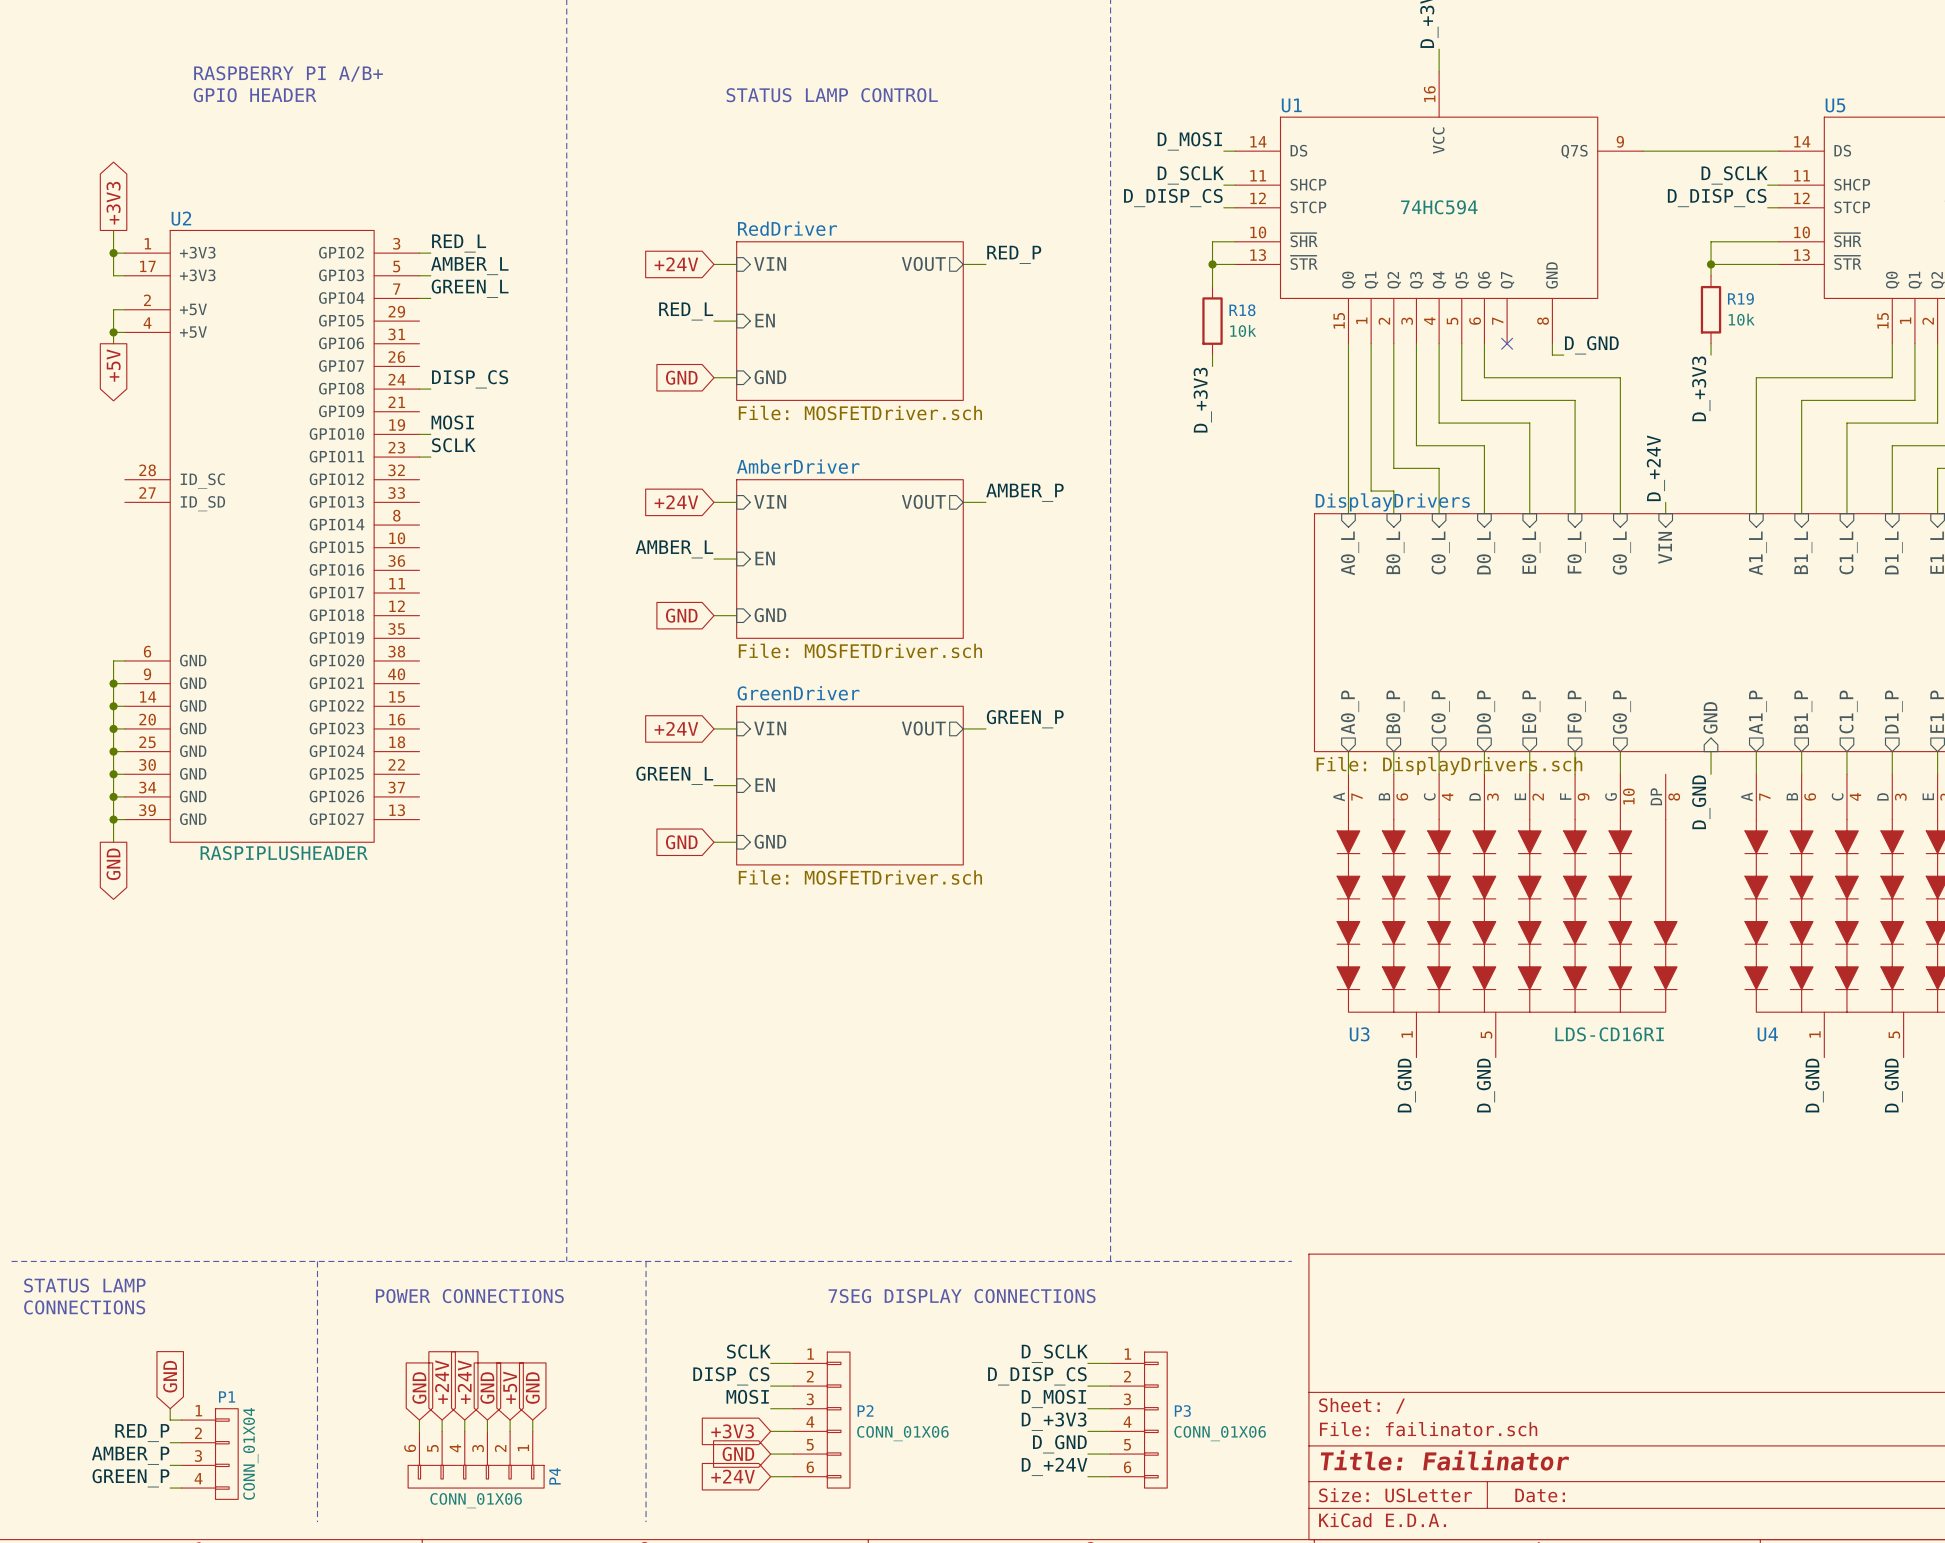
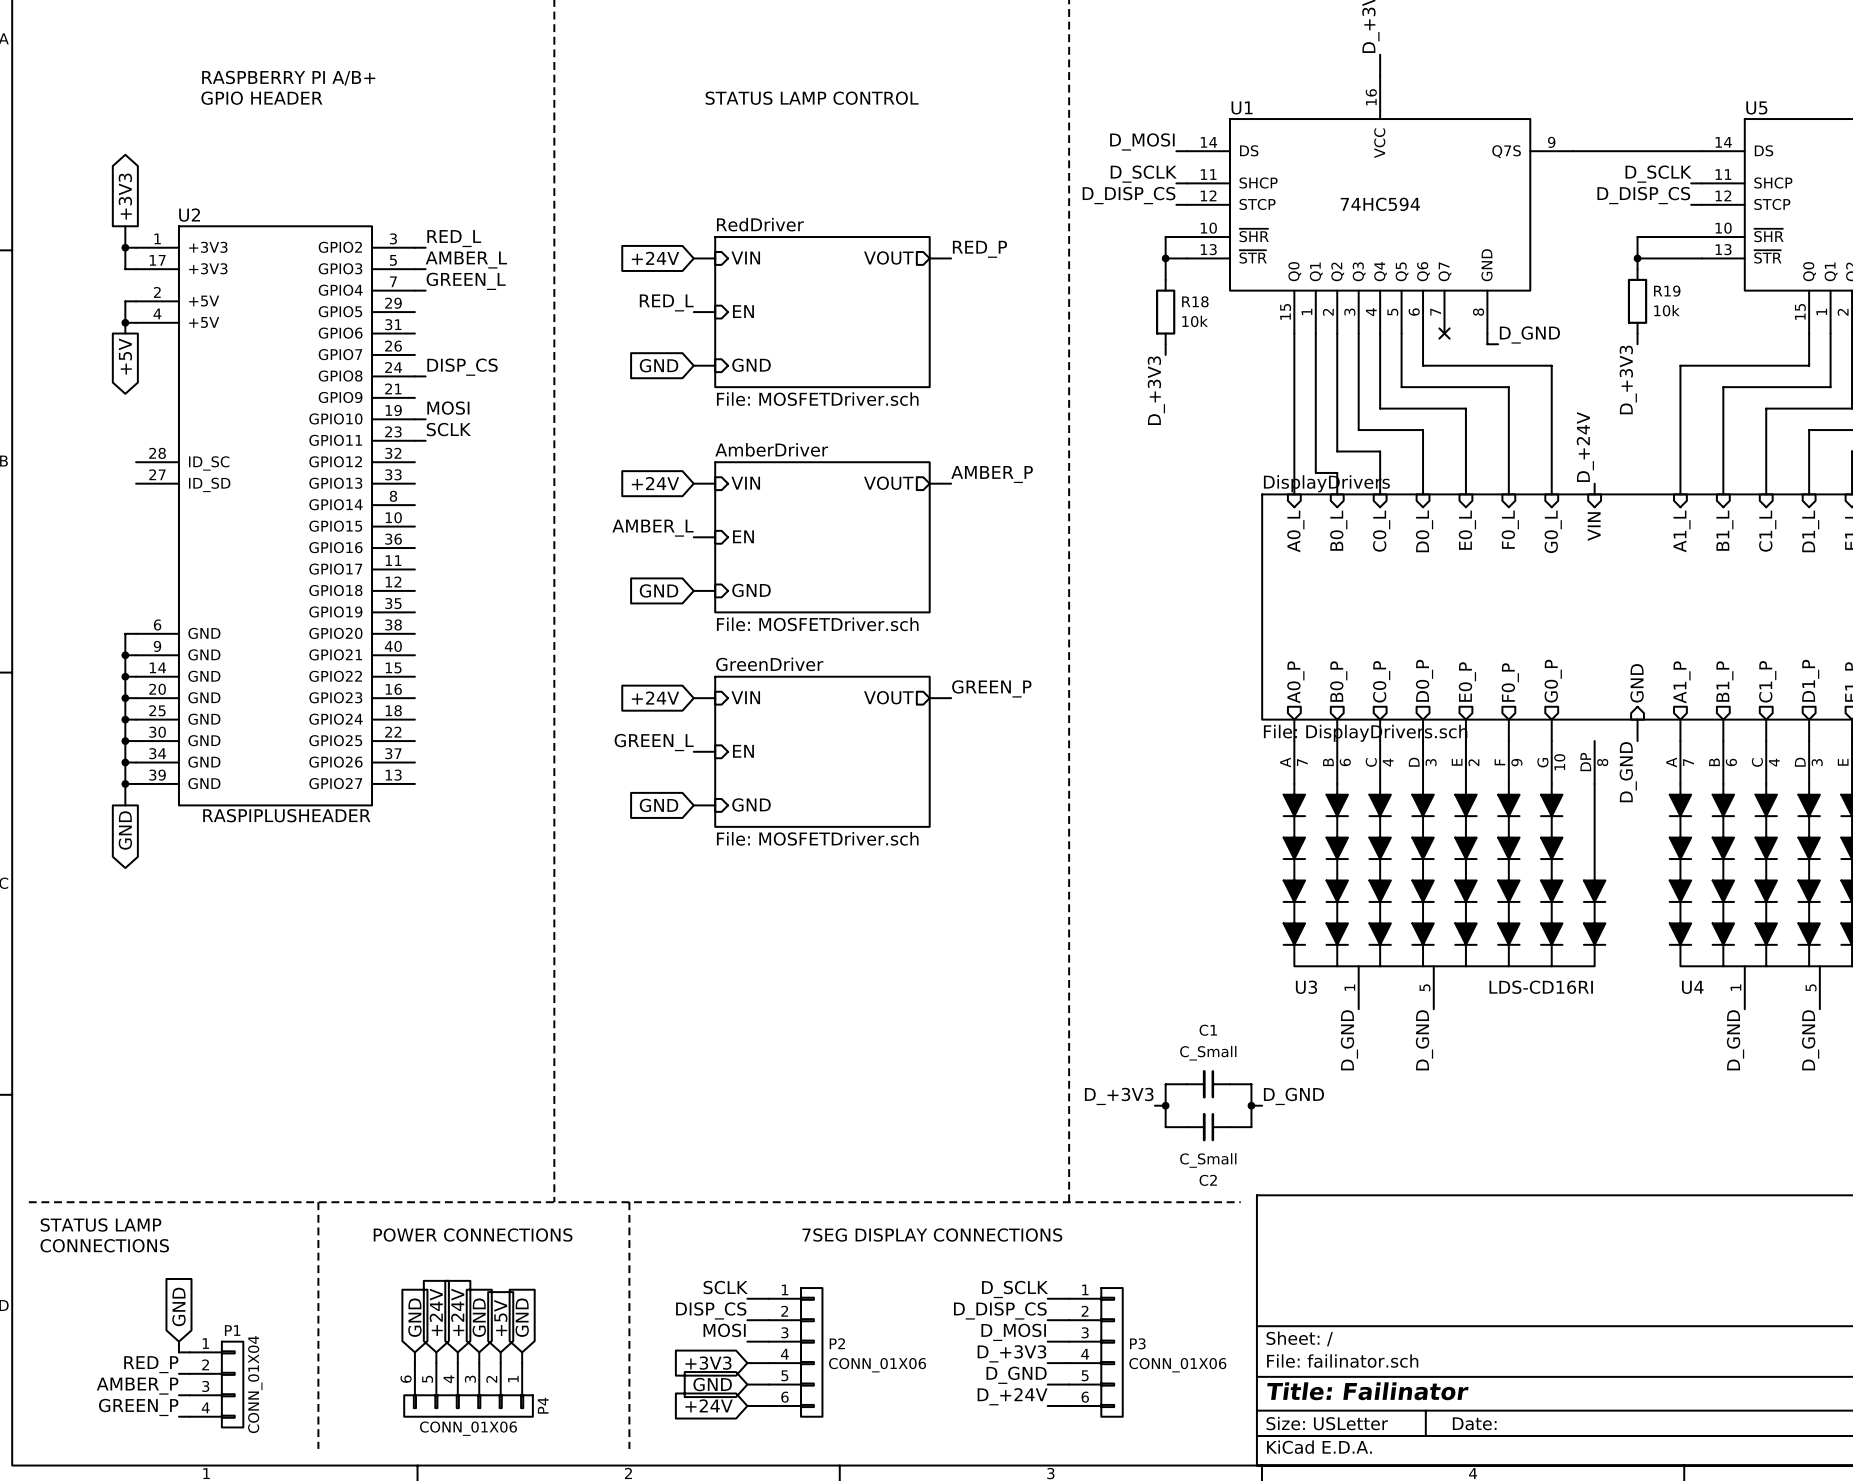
wire: none -> (1187, 1084) (1165, 1084) (1165, 1127) (1187, 1127)
C1: none -> C_Small (1208, 1084)
wire: none -> (1229, 1084) (1251, 1084) (1251, 1127) (1229, 1127)
label: none -> D_+3V3 (1119, 1096)
label: none -> D_GND (1293, 1096)
wire: none -> (1154, 1105) (1165, 1105)
junction: none -> (1165, 1105)
wire: none -> (1251, 1105) (1262, 1105)
junction: none -> (1251, 1105)
C2: none -> C_Small (1208, 1127)

